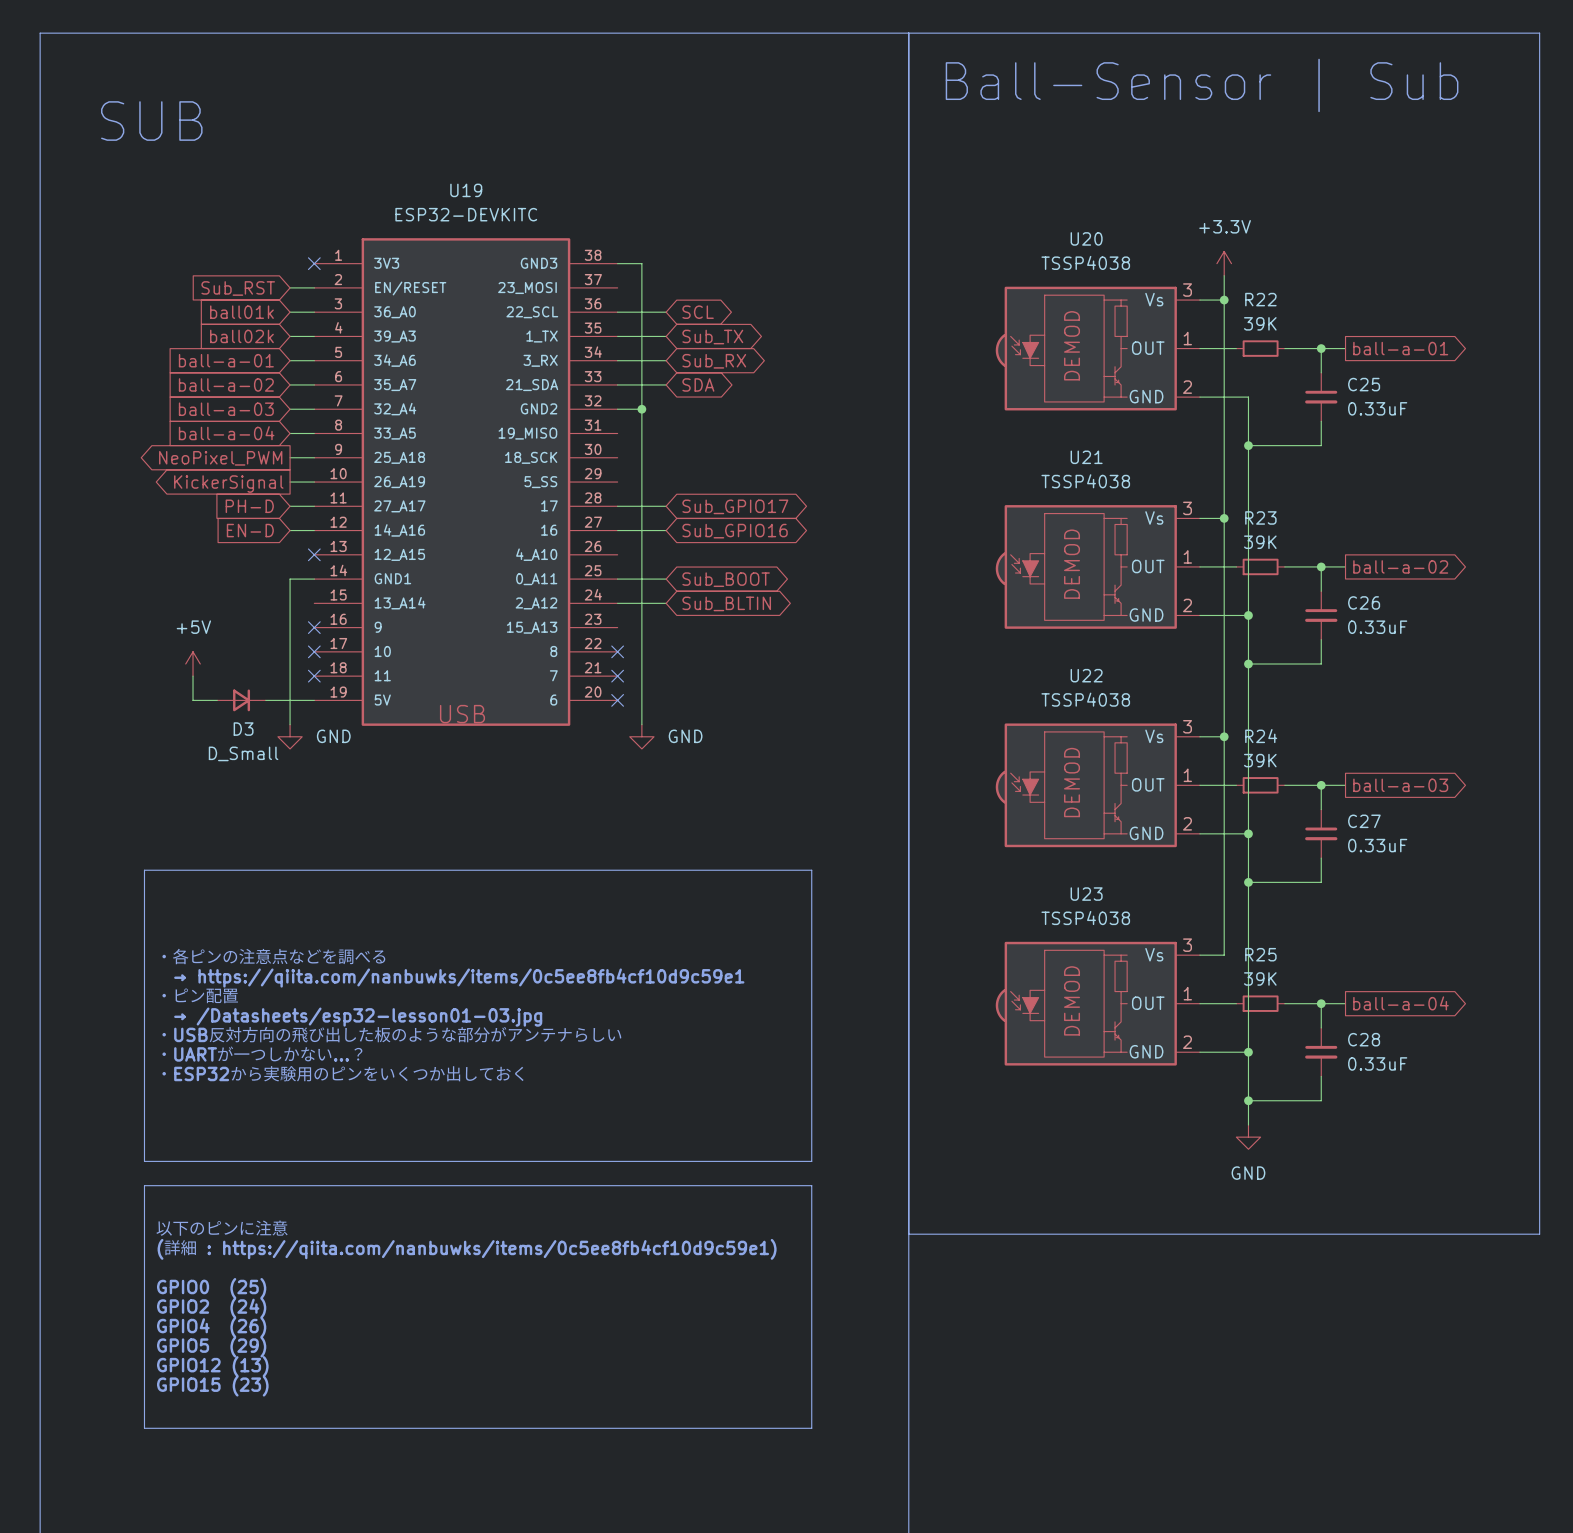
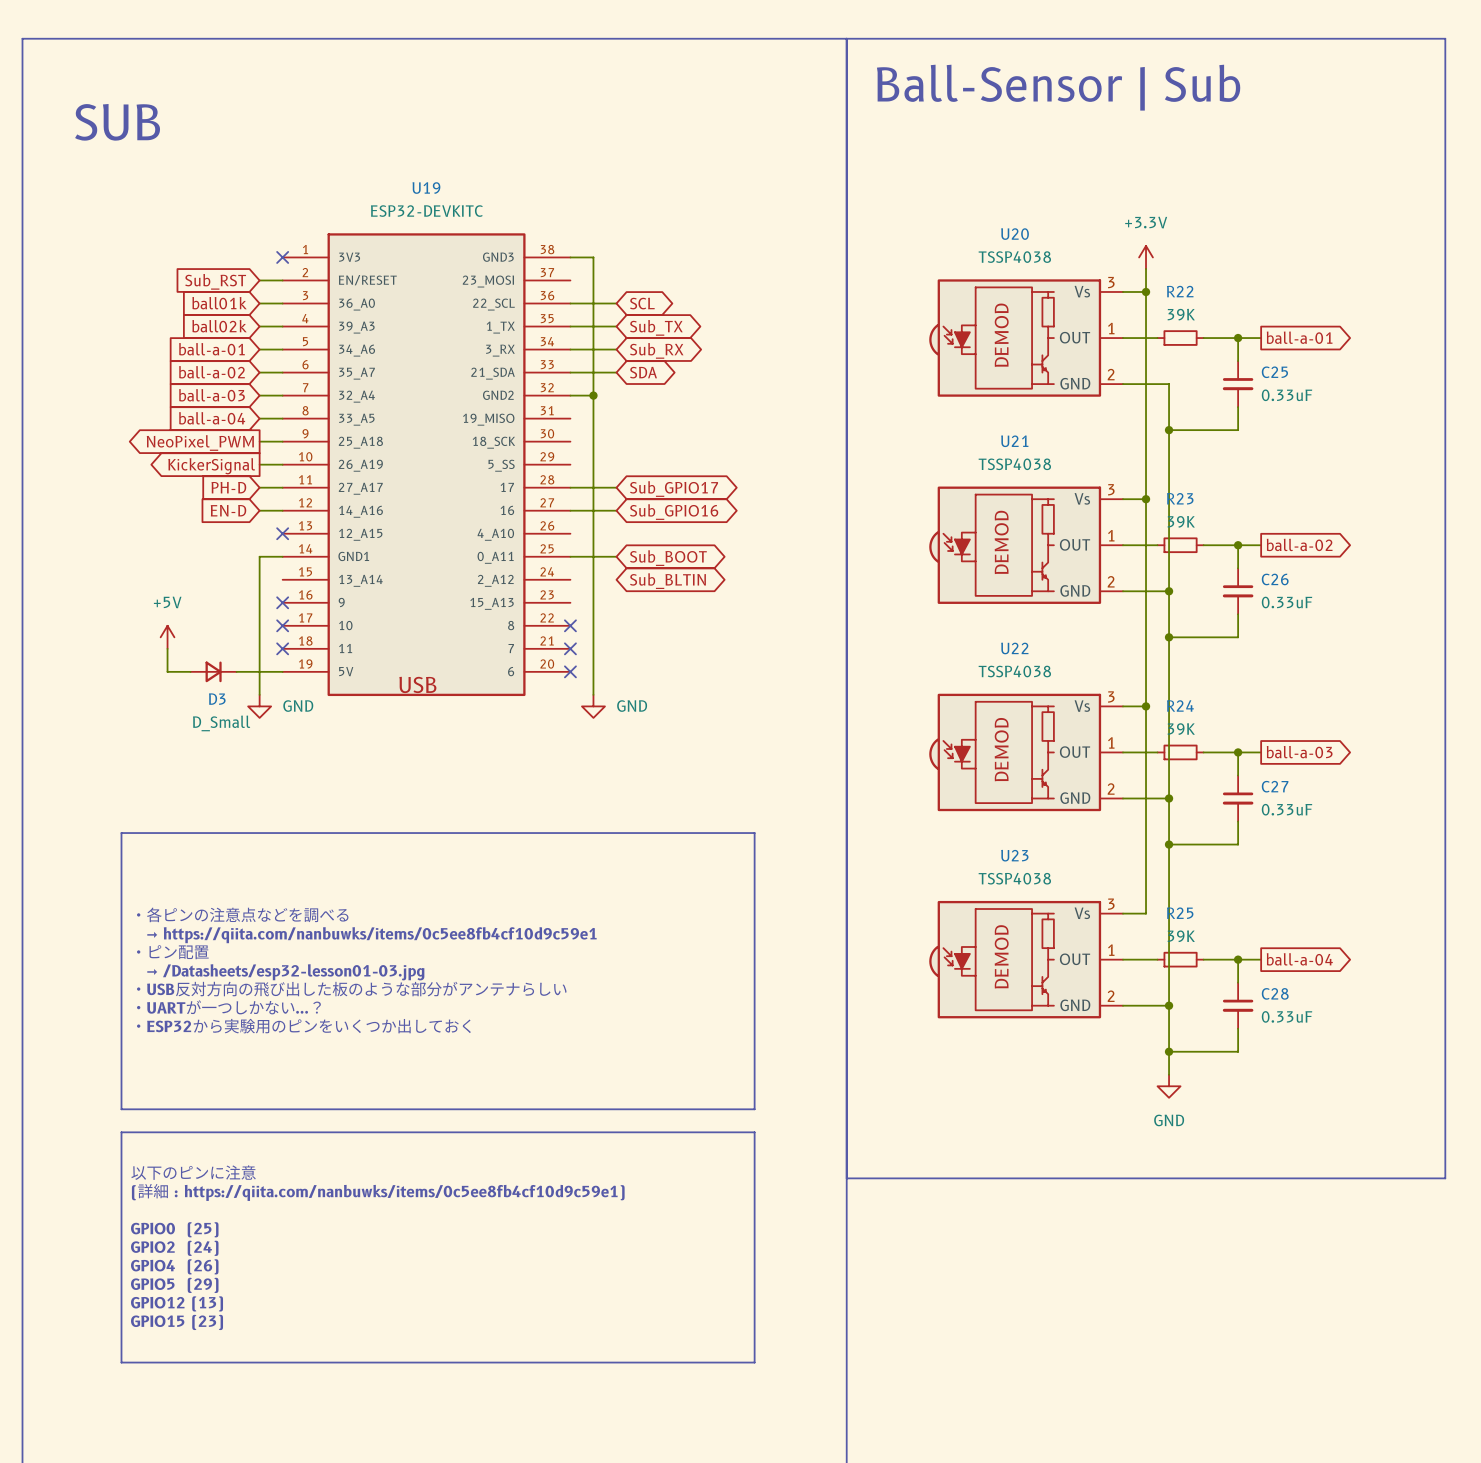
wire: (617, 603) (666, 603) -> none

